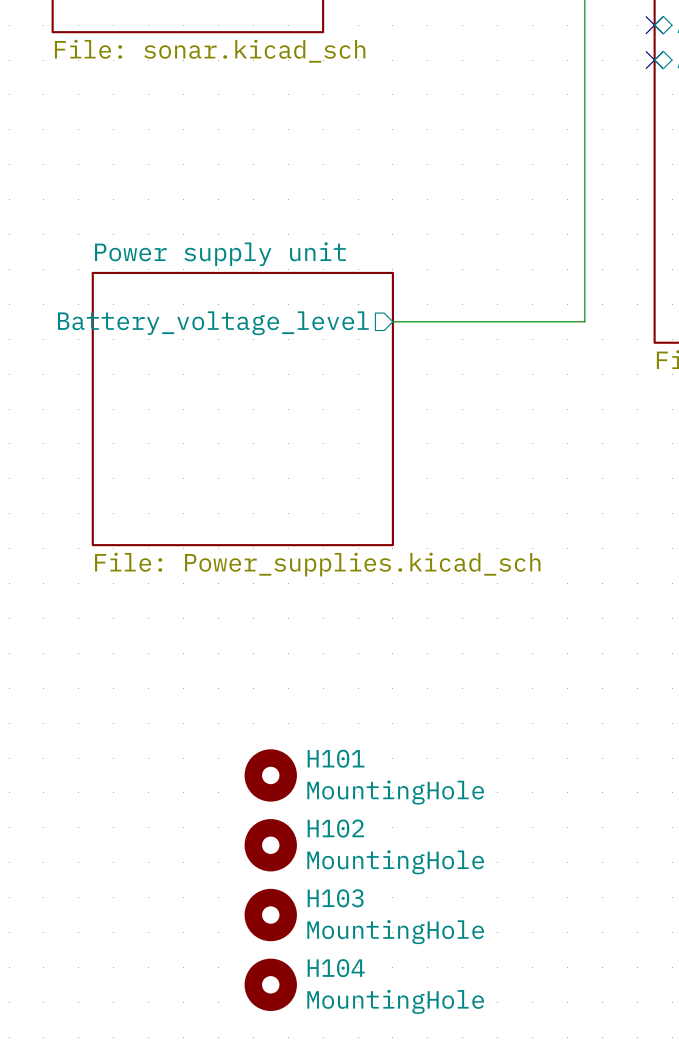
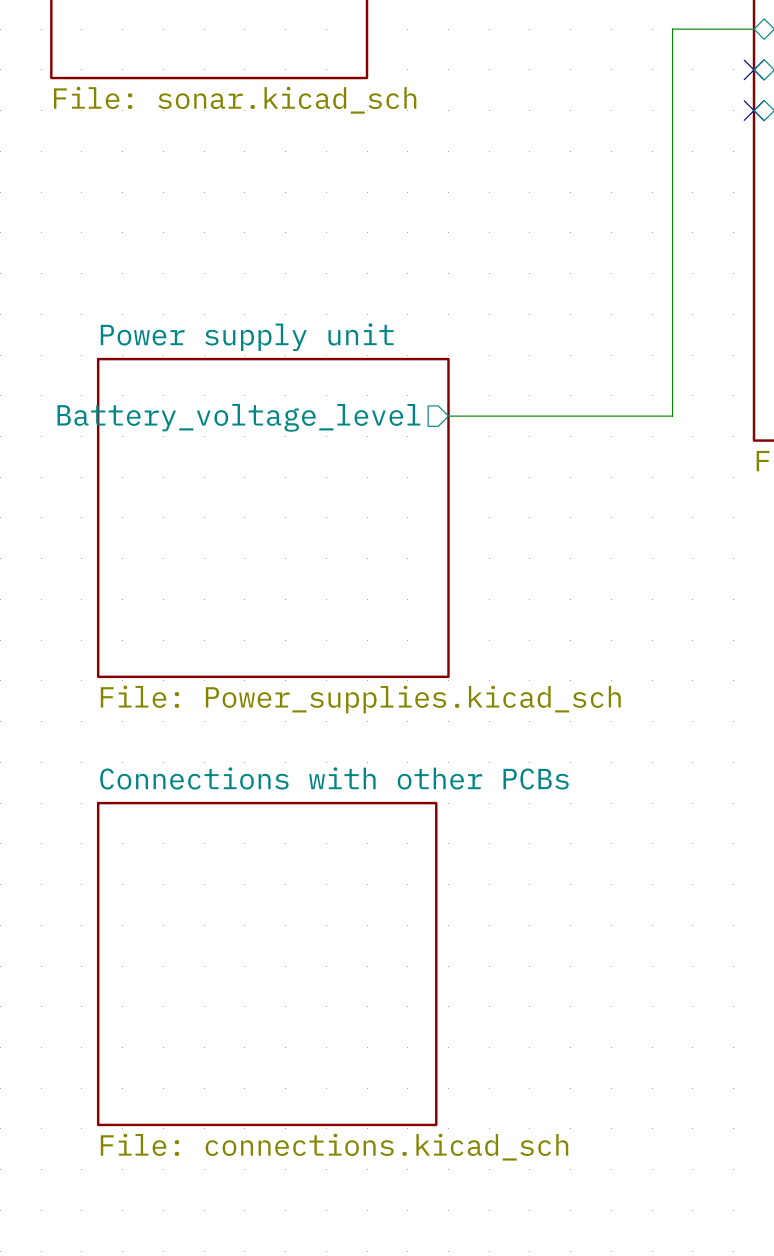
H101: MountingHole (270, 775) -> none
sheet Connections with other PCBs: none -> File: connections.kicad_sch (267, 964)
H102: MountingHole (270, 845) -> none
H103: MountingHole (270, 915) -> none
H104: MountingHole (270, 984) -> none

